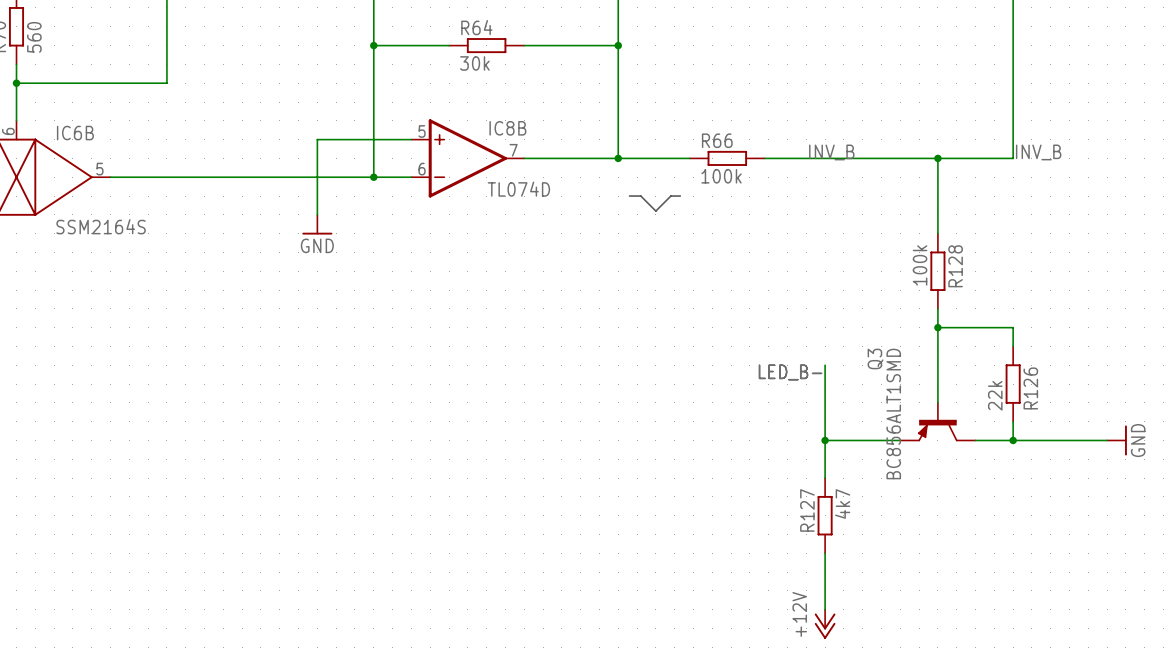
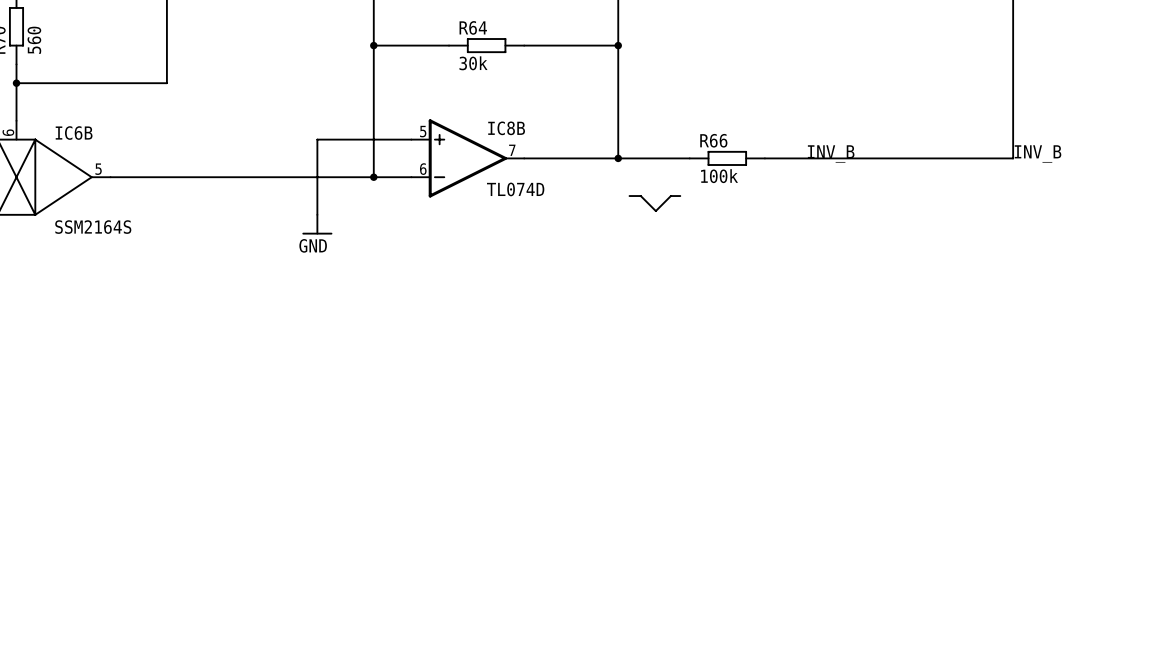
wire: (937, 158) (937, 233) -> none
junction: (937, 158) -> none
R128: 100k (937, 271) -> none
wire: (937, 308) (937, 402) -> none
wire: (937, 327) (1013, 327) (1013, 346) -> none
junction: (937, 327) -> none
wire: (825, 365) (825, 478) -> none
label: LED_B- (790, 372) -> none
R126: 22k (1013, 384) -> none
Q3: BC856ALT1SMD (937, 421) -> none
wire: (1013, 421) (1013, 440) -> none
wire: (825, 440) (900, 440) -> none
junction: (825, 440) -> none
wire: (975, 440) (1107, 440) -> none
junction: (1013, 440) -> none
power symbol: GND (1117, 440) -> none
R127: 4k7 (825, 515) -> none
wire: (825, 553) (825, 609) -> none
power symbol: +12V (825, 624) -> none

